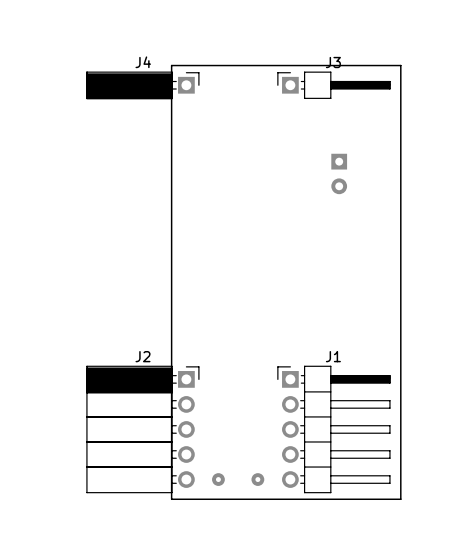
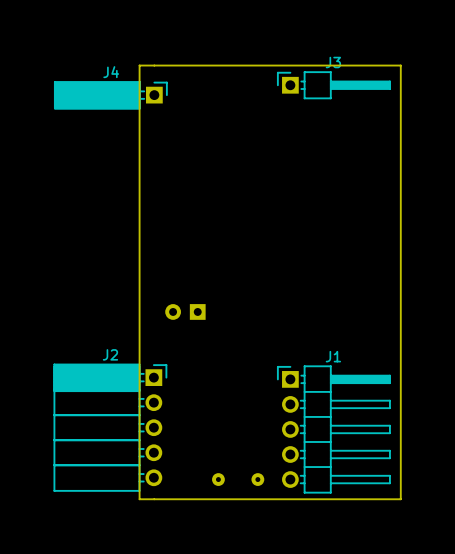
board edge: (171, 65) (171, 499) -> (171, 65) (139, 65) (139, 499) (171, 499)
J4 position: (142, 85) -> (110, 95)
part rotation: 0° (339, 173) -> 90° clockwise (185, 311)
part position: (339, 173) -> (185, 311)
J2 position: (142, 429) -> (110, 427)

